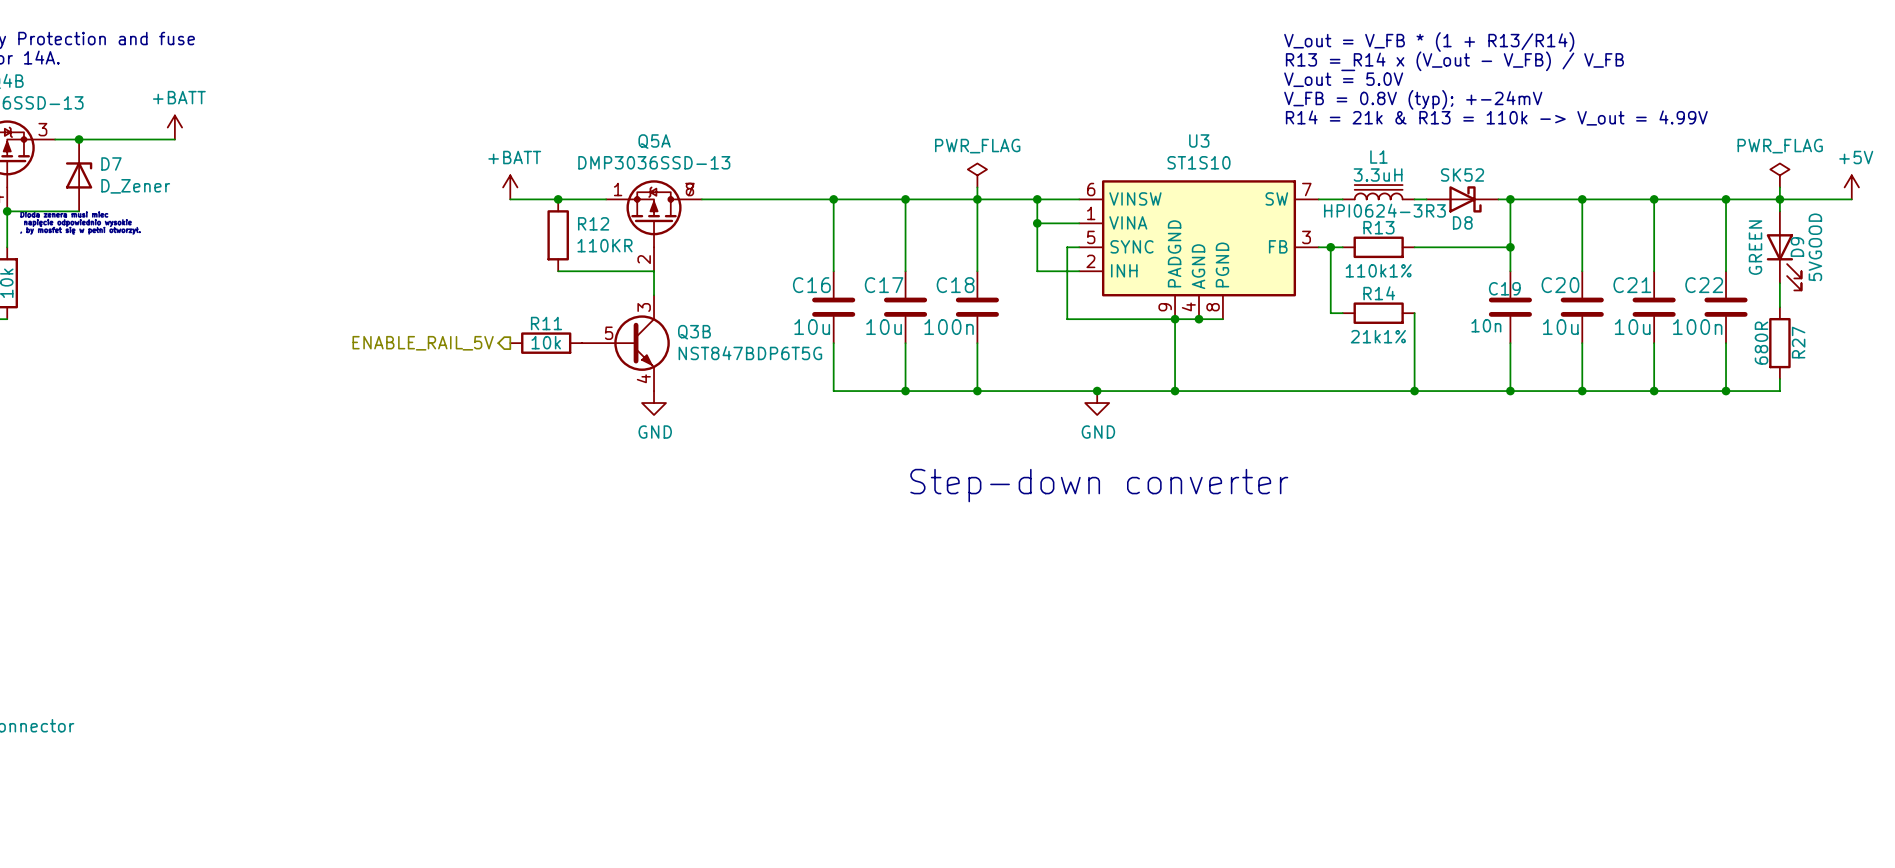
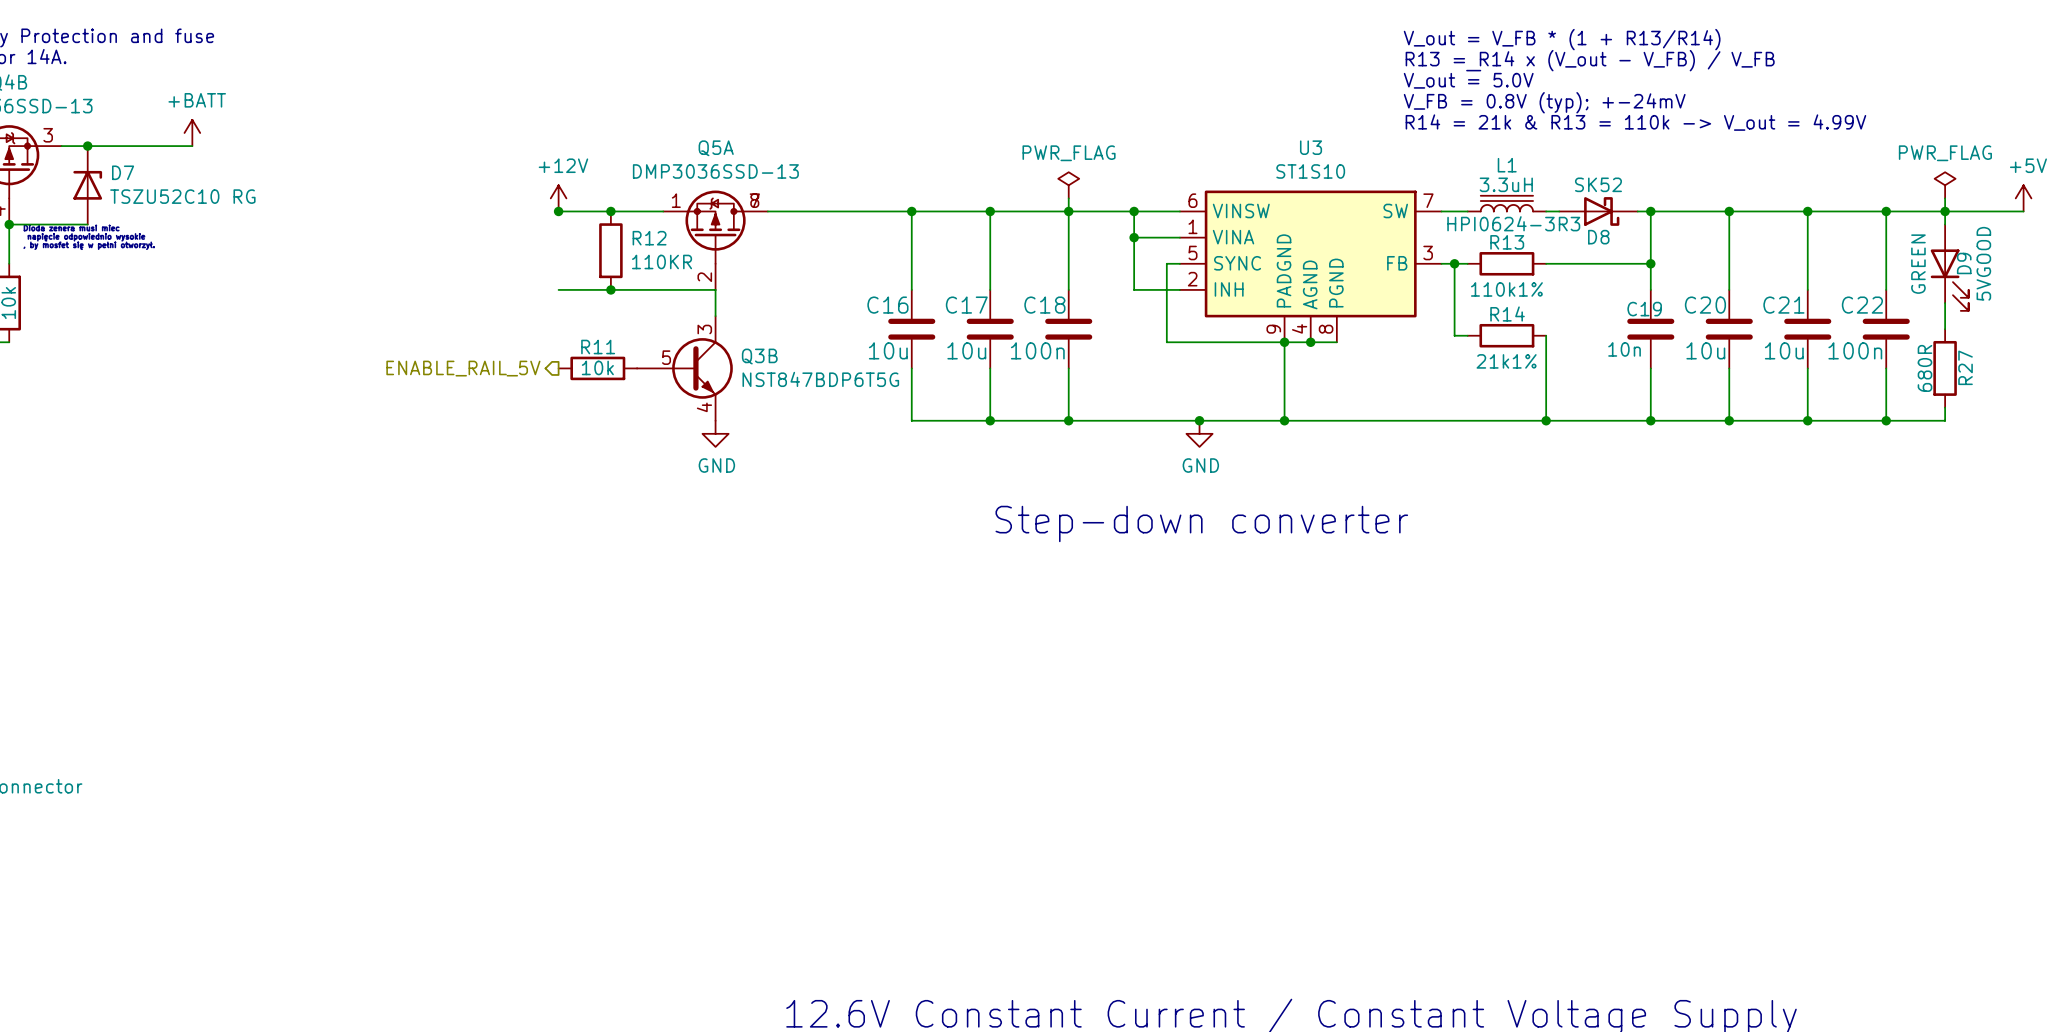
D7 value: D_Zener (135, 186) -> TSZU52C10 RG (182, 196)
power symbol: +BATT (510, 187) -> +12V (558, 198)
junction: none -> (558, 211)
wire: none -> (558, 289) (610, 289)
junction: none -> (610, 289)

